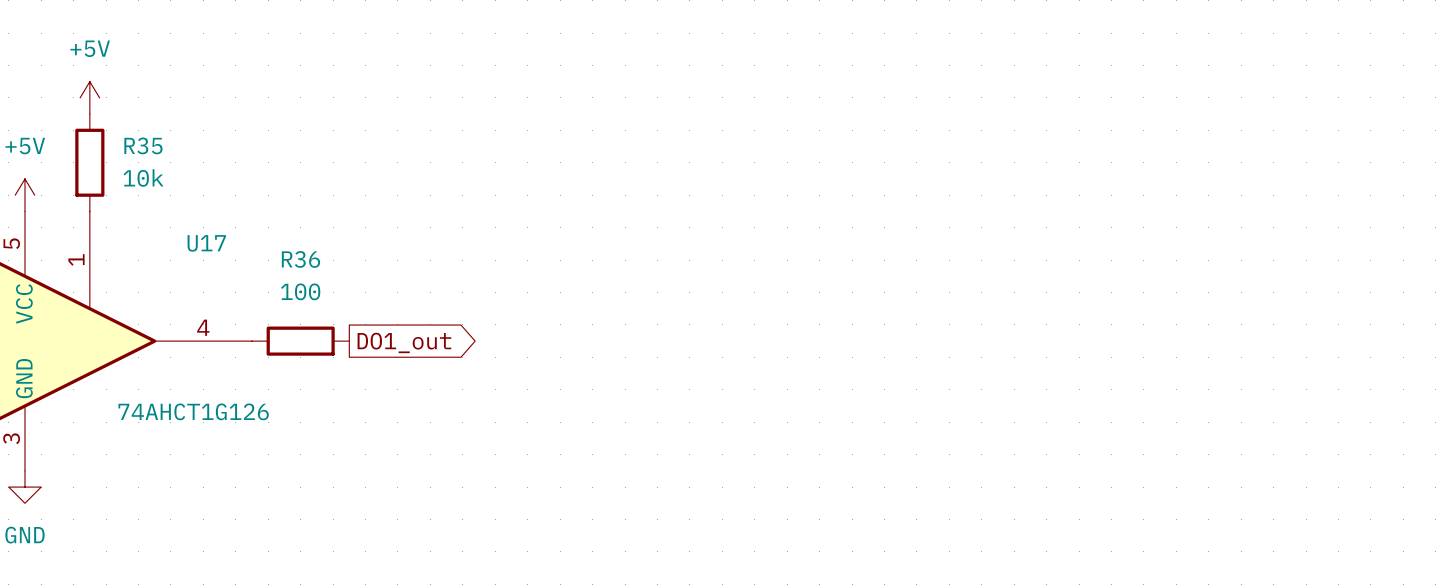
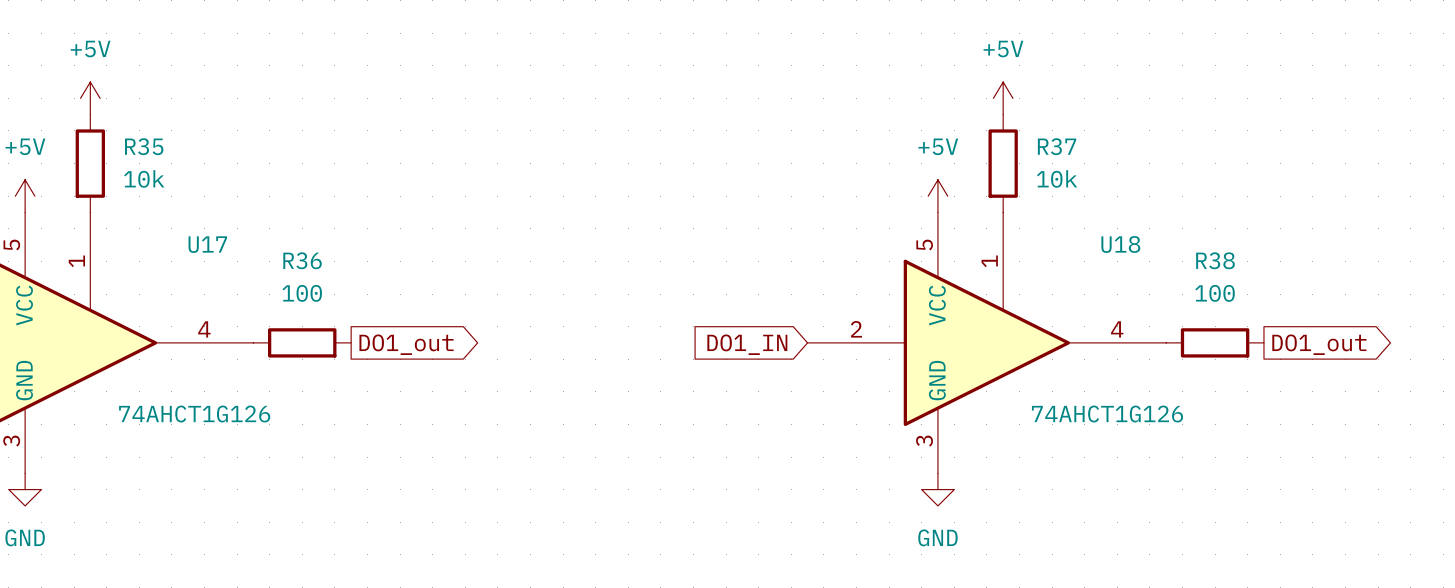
power symbol: none -> +5V (1003, 98)
R37: none -> 10k (1003, 163)
power symbol: none -> +5V (937, 196)
U18: none -> 74AHCT1G126 (986, 342)
R38: none -> 100 (1215, 342)
global label: none -> DO1_IN (747, 344)
global label: none -> DO1_out (1319, 344)
power symbol: none -> GND (937, 489)

